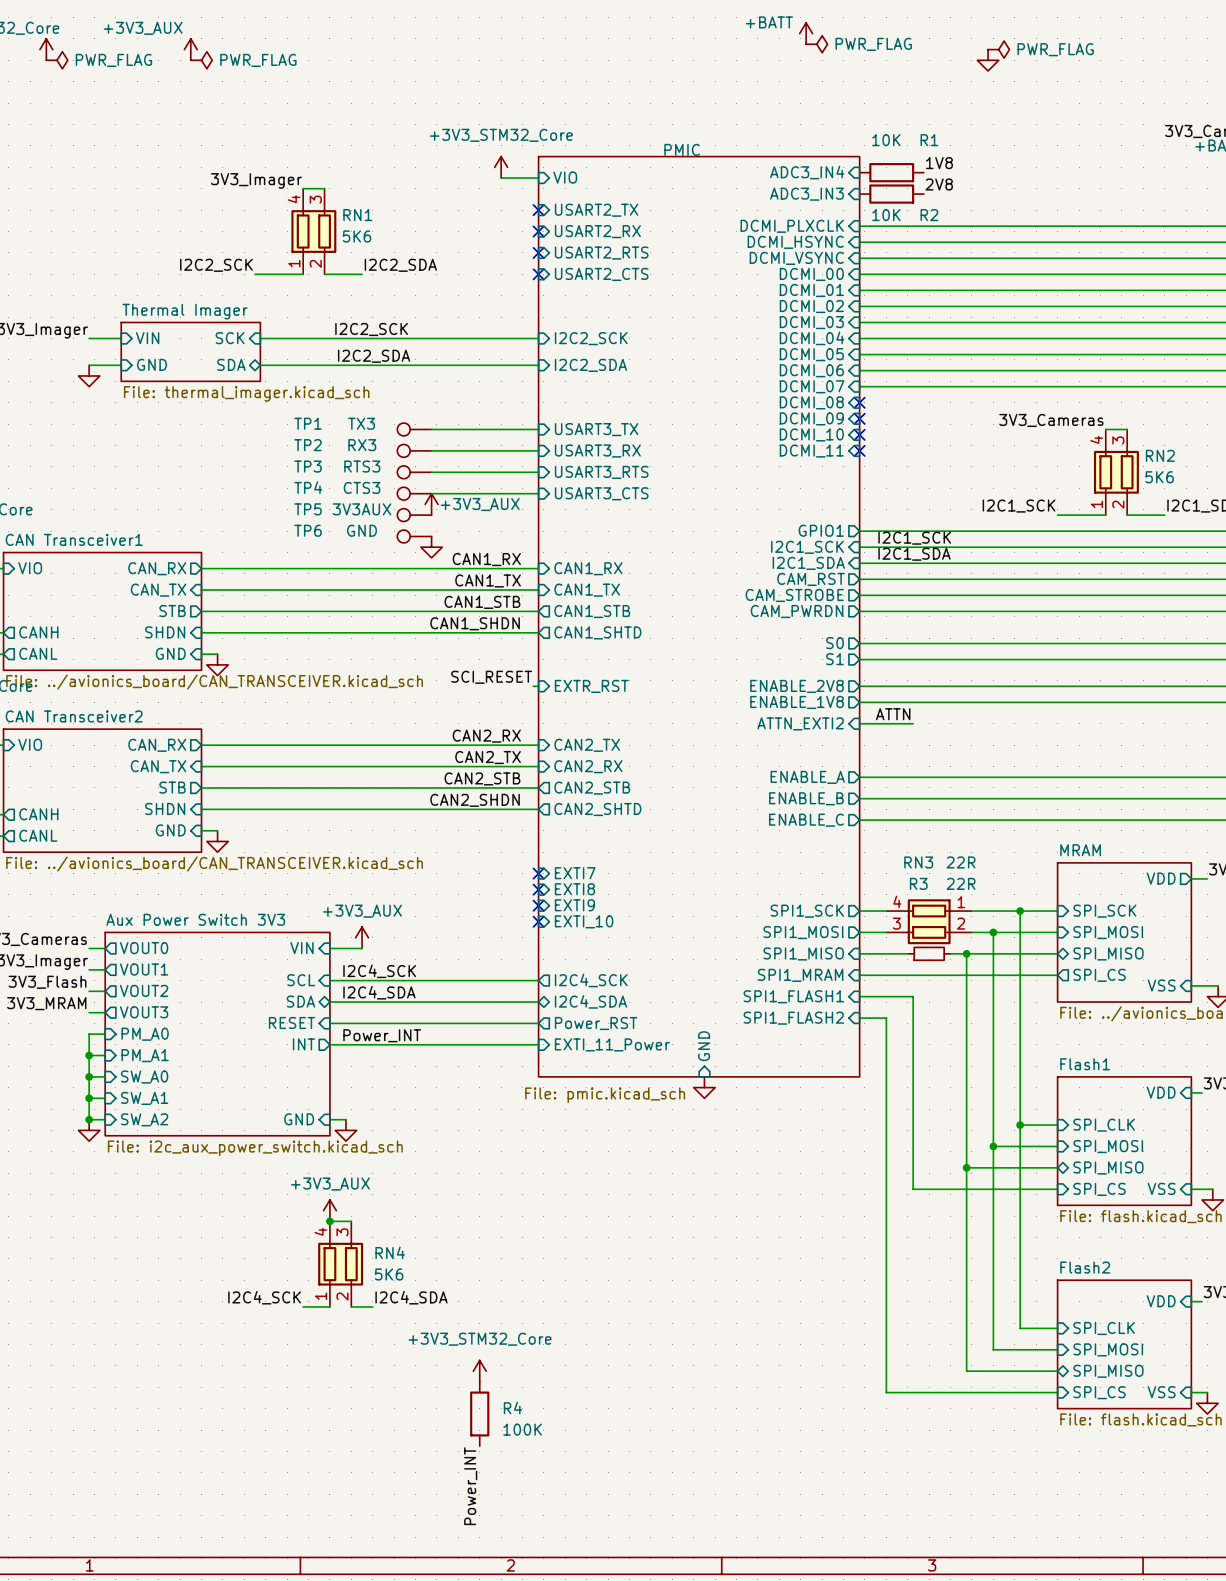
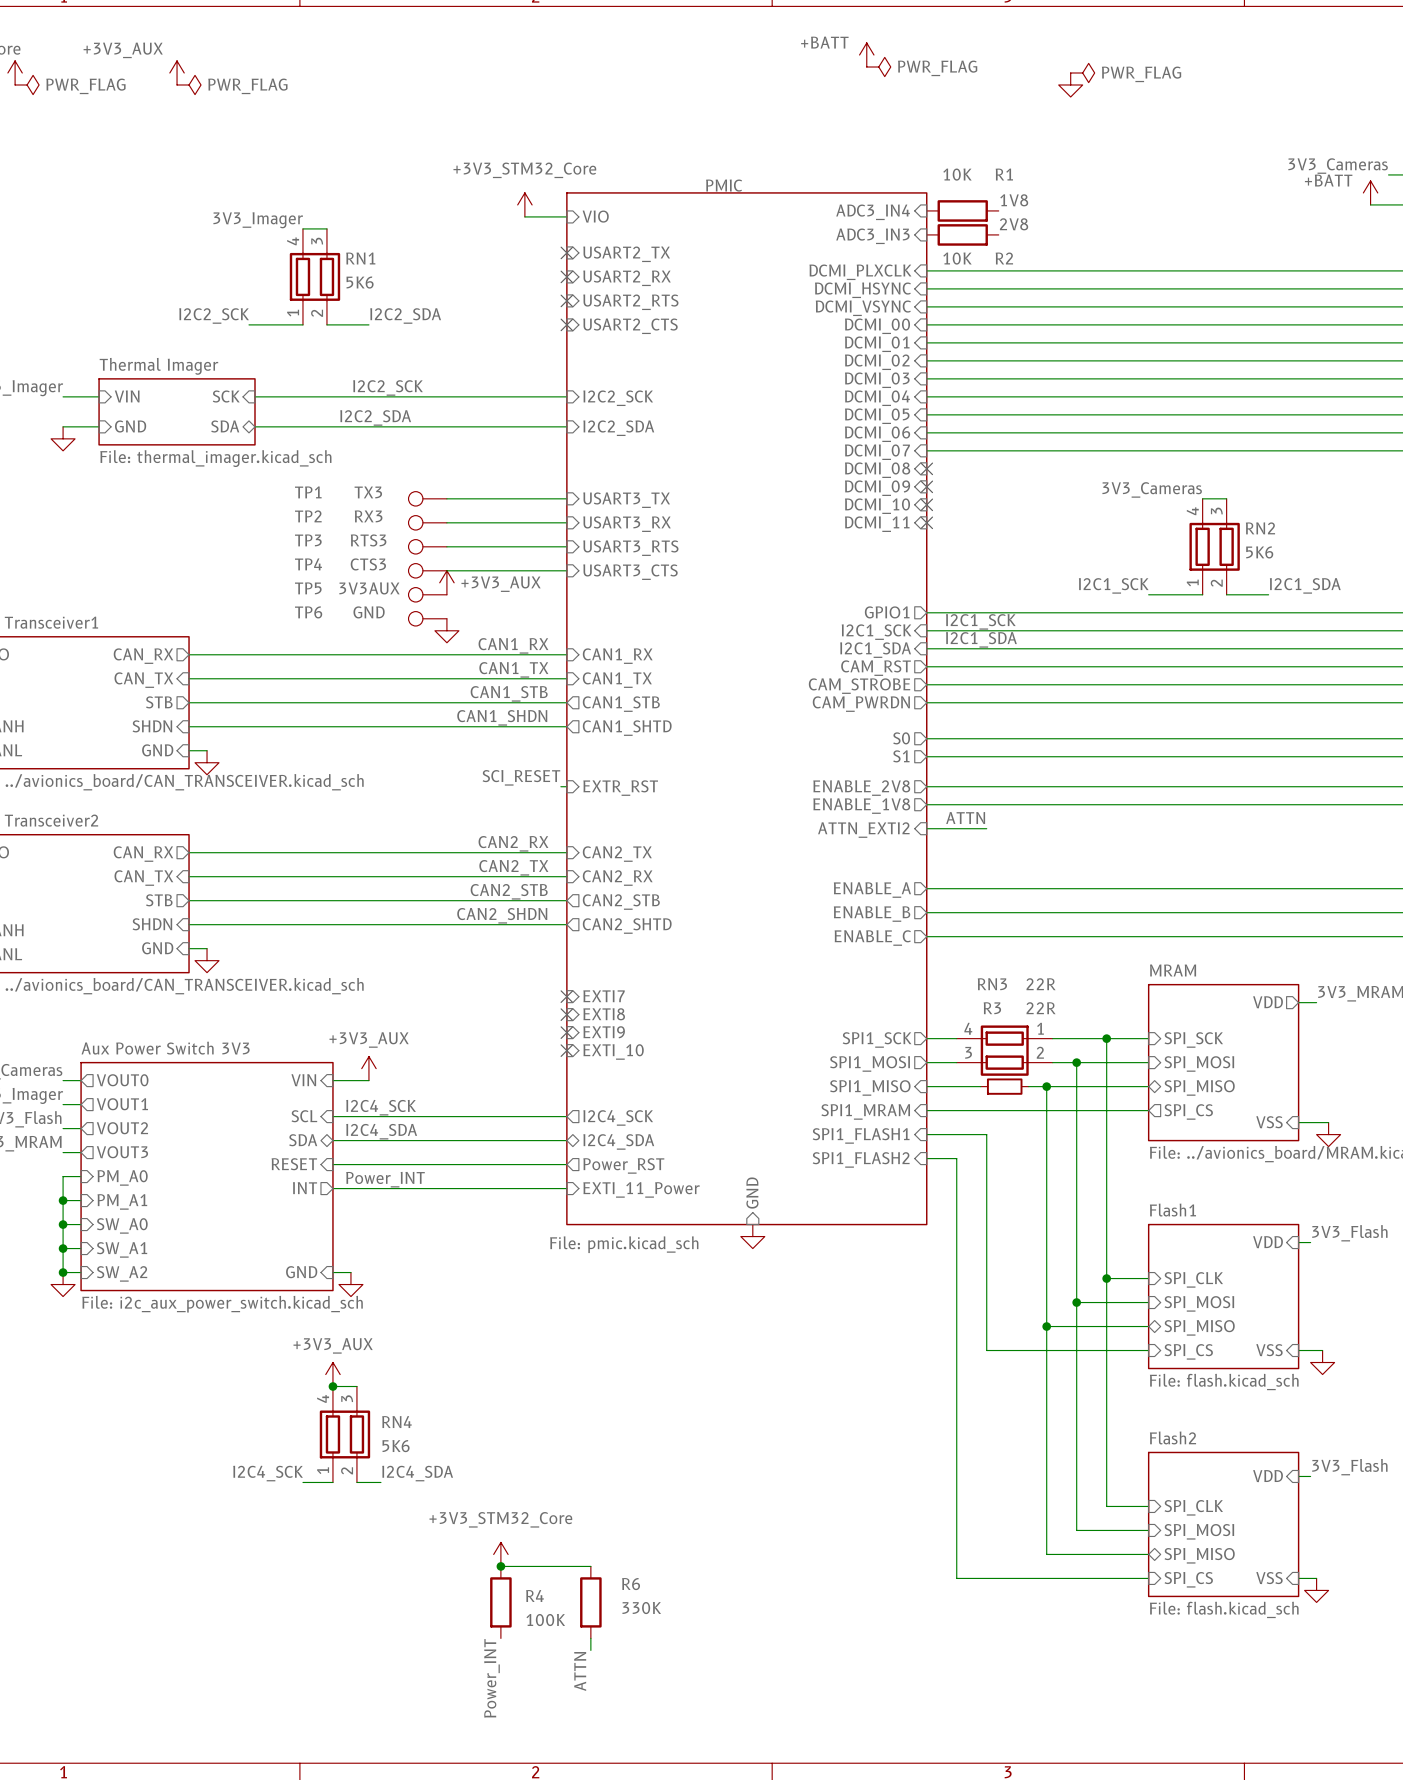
wire: none -> (500, 1566) (590, 1566)
junction: none -> (500, 1566)
R6: none -> 330K (590, 1602)
wire: none -> (590, 1638) (590, 1650)
label: none -> ATTN (580, 1671)

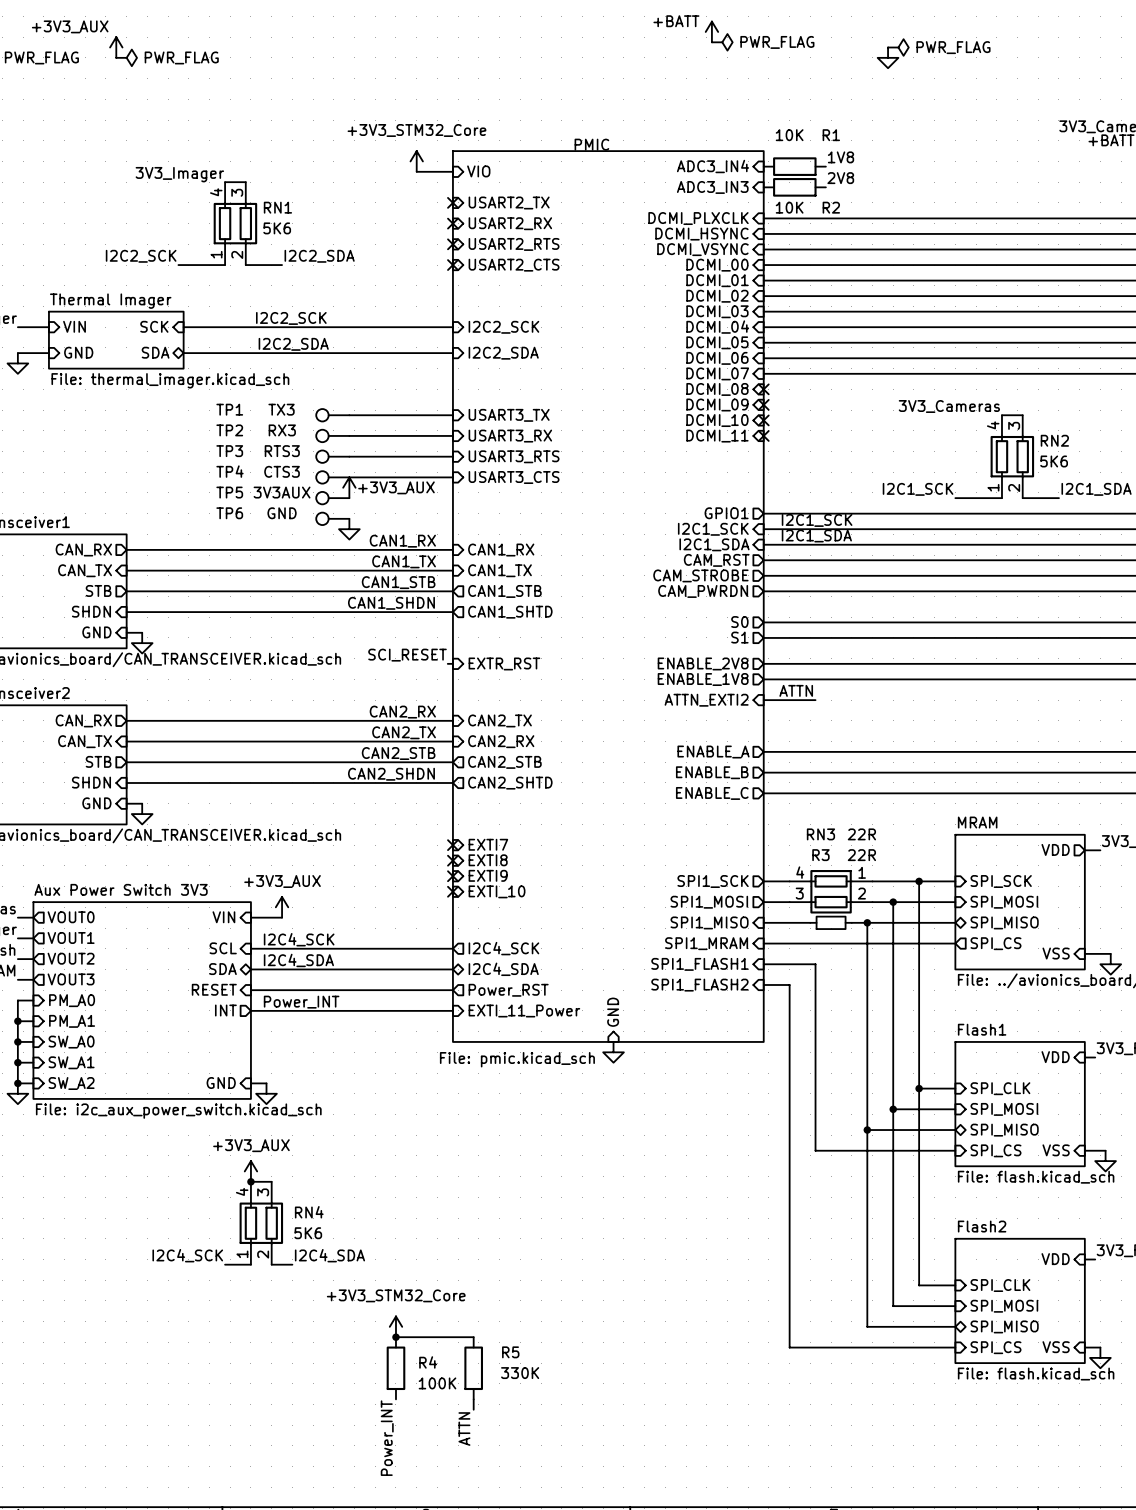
R6 name: R6 (631, 1584) -> R5 (510, 1352)

